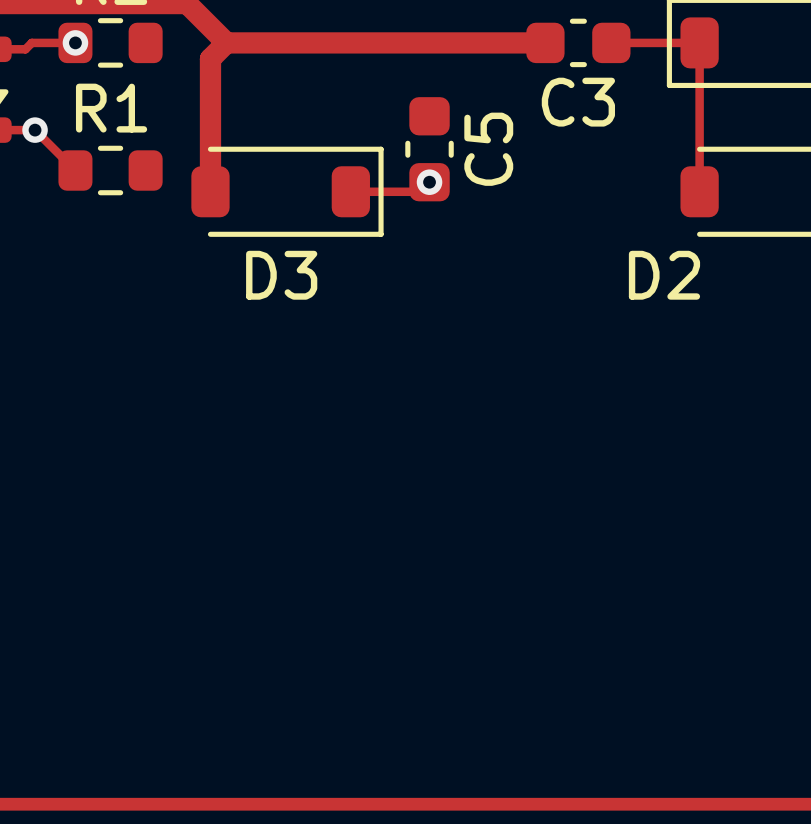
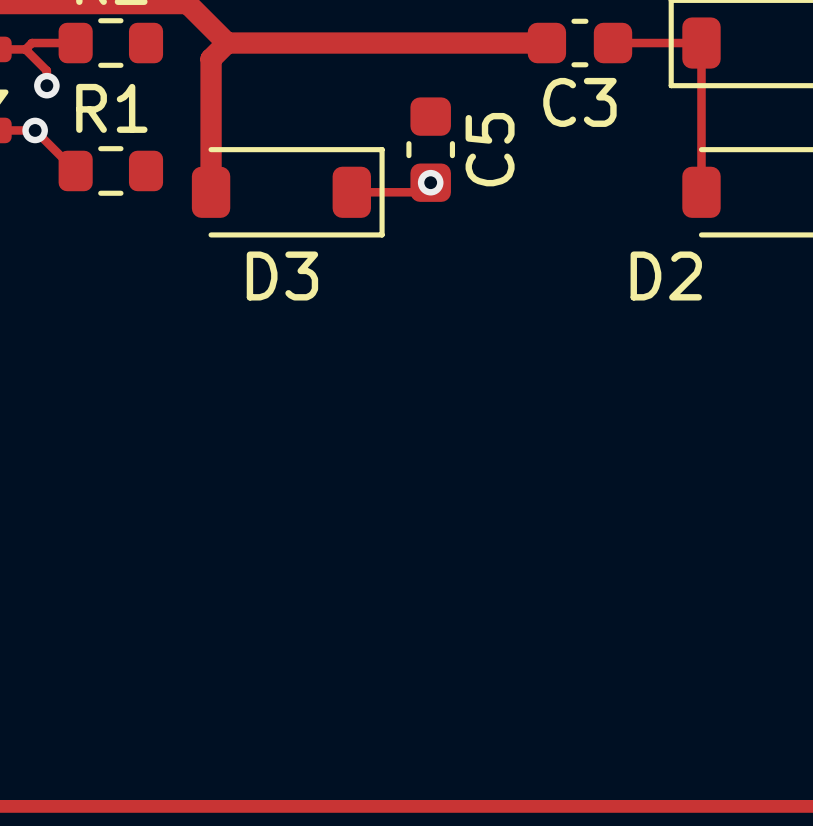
via position: (75, 42) -> (46, 85)
track: none -> (25, 49) (46, 70) (46, 85)

